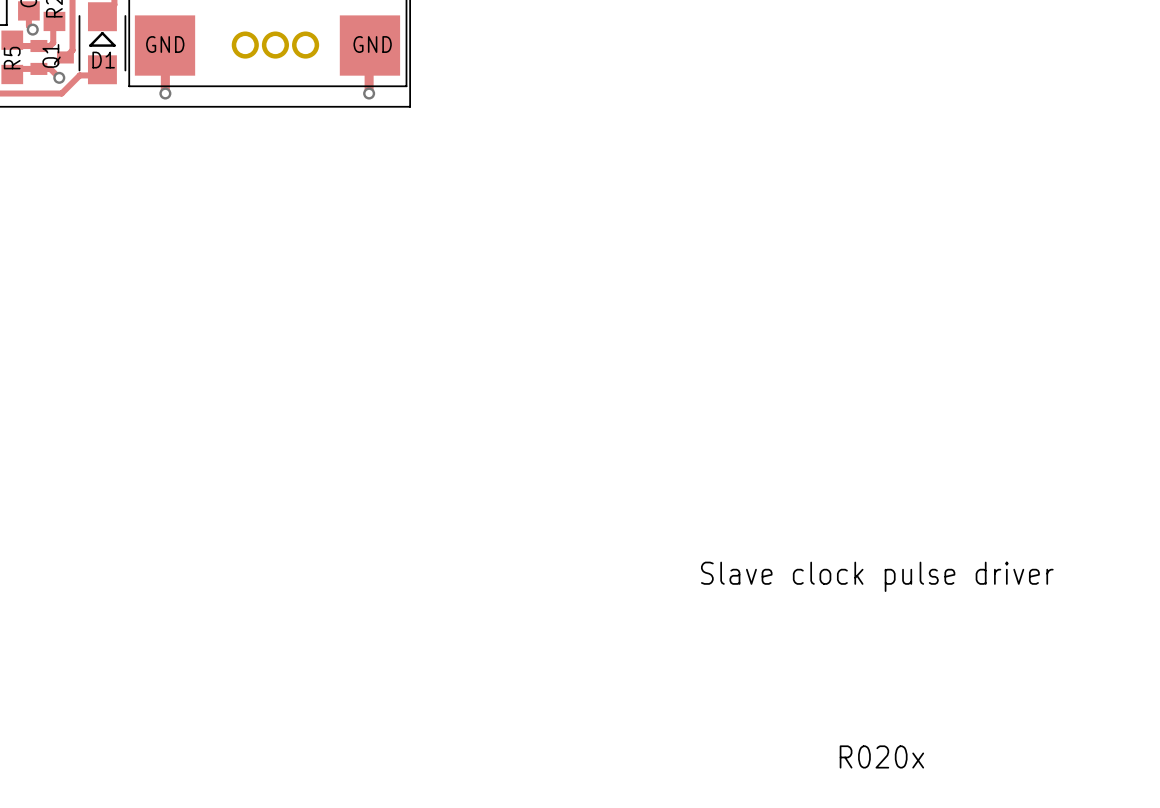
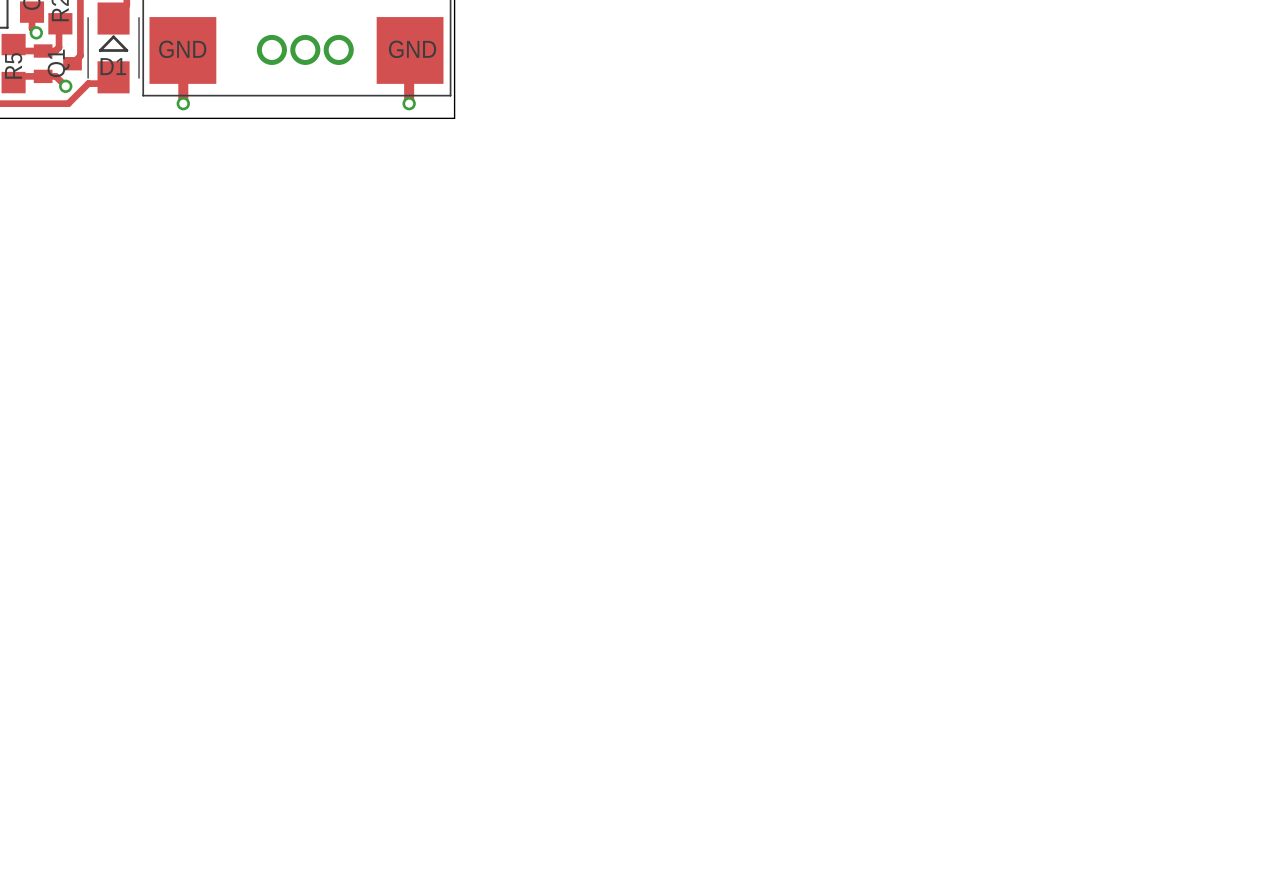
drawing: [700, 561, 1054, 769] -> none

